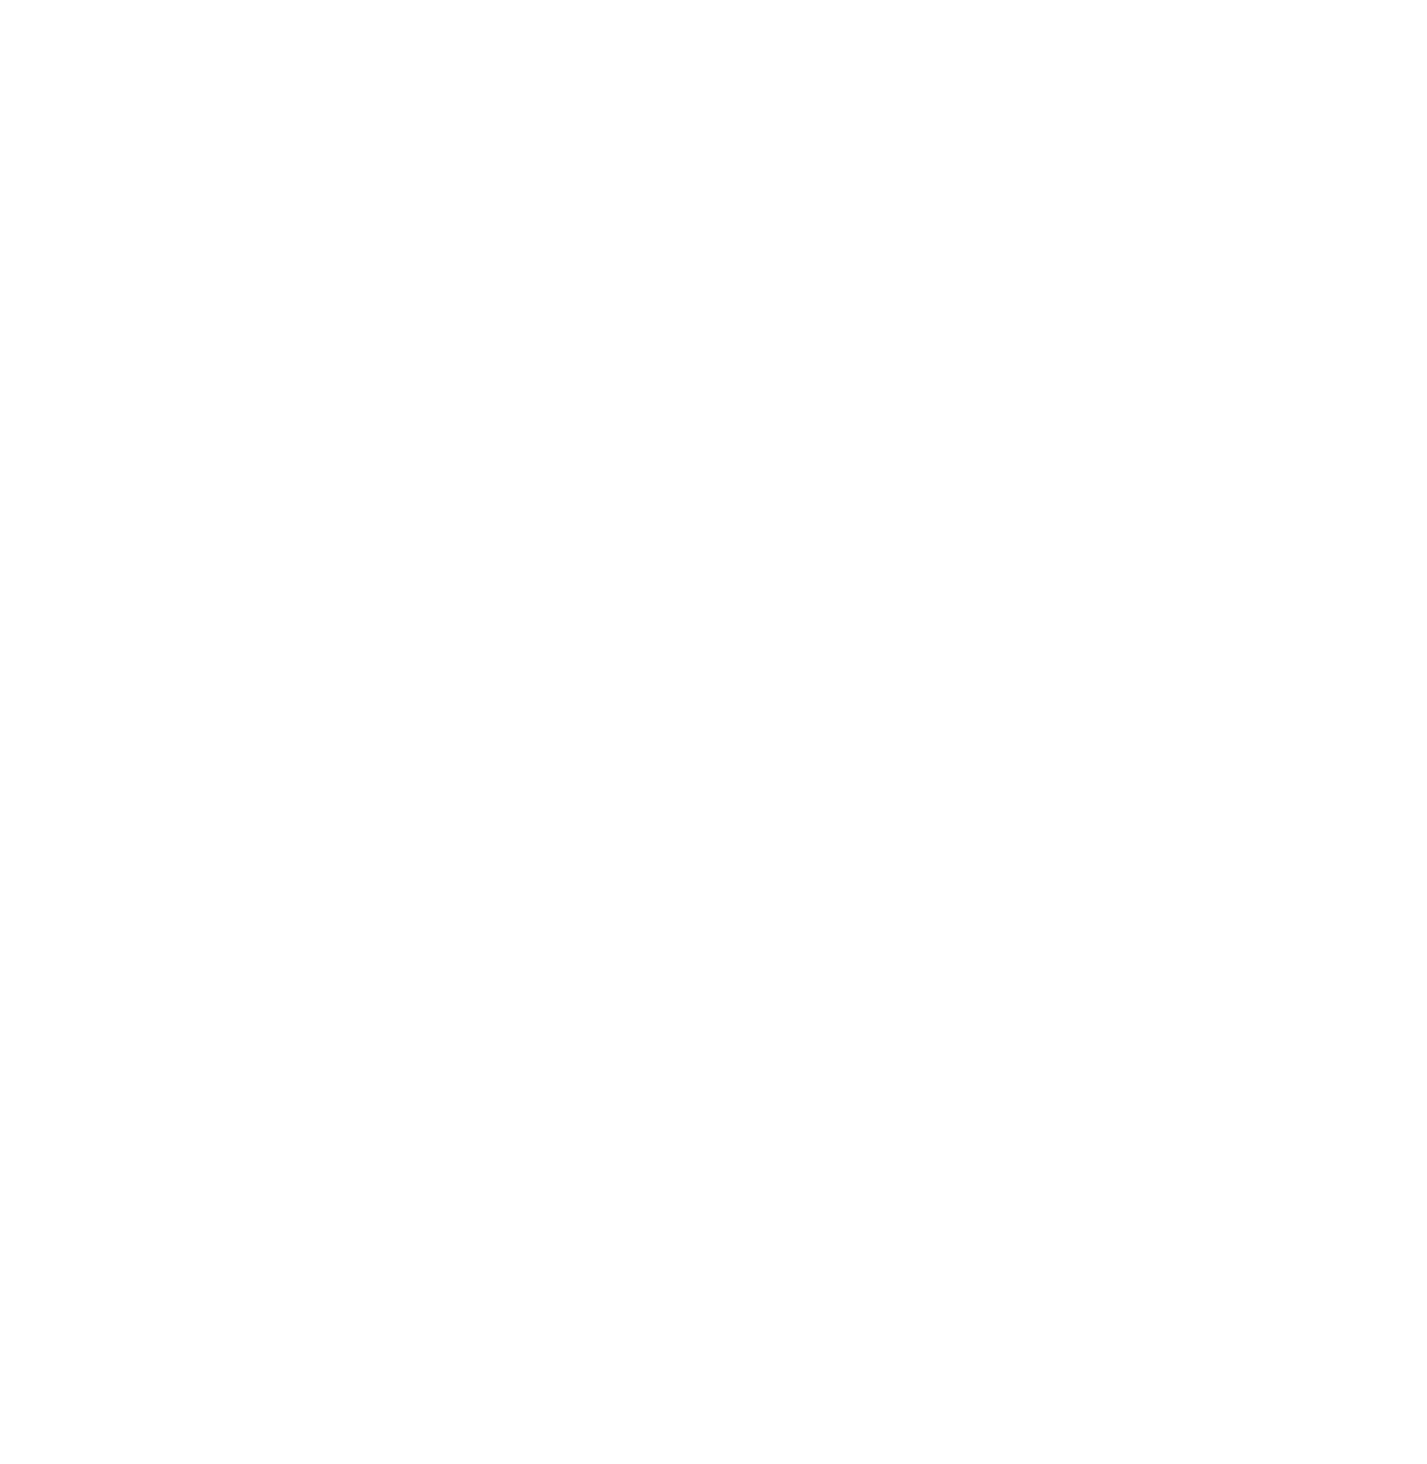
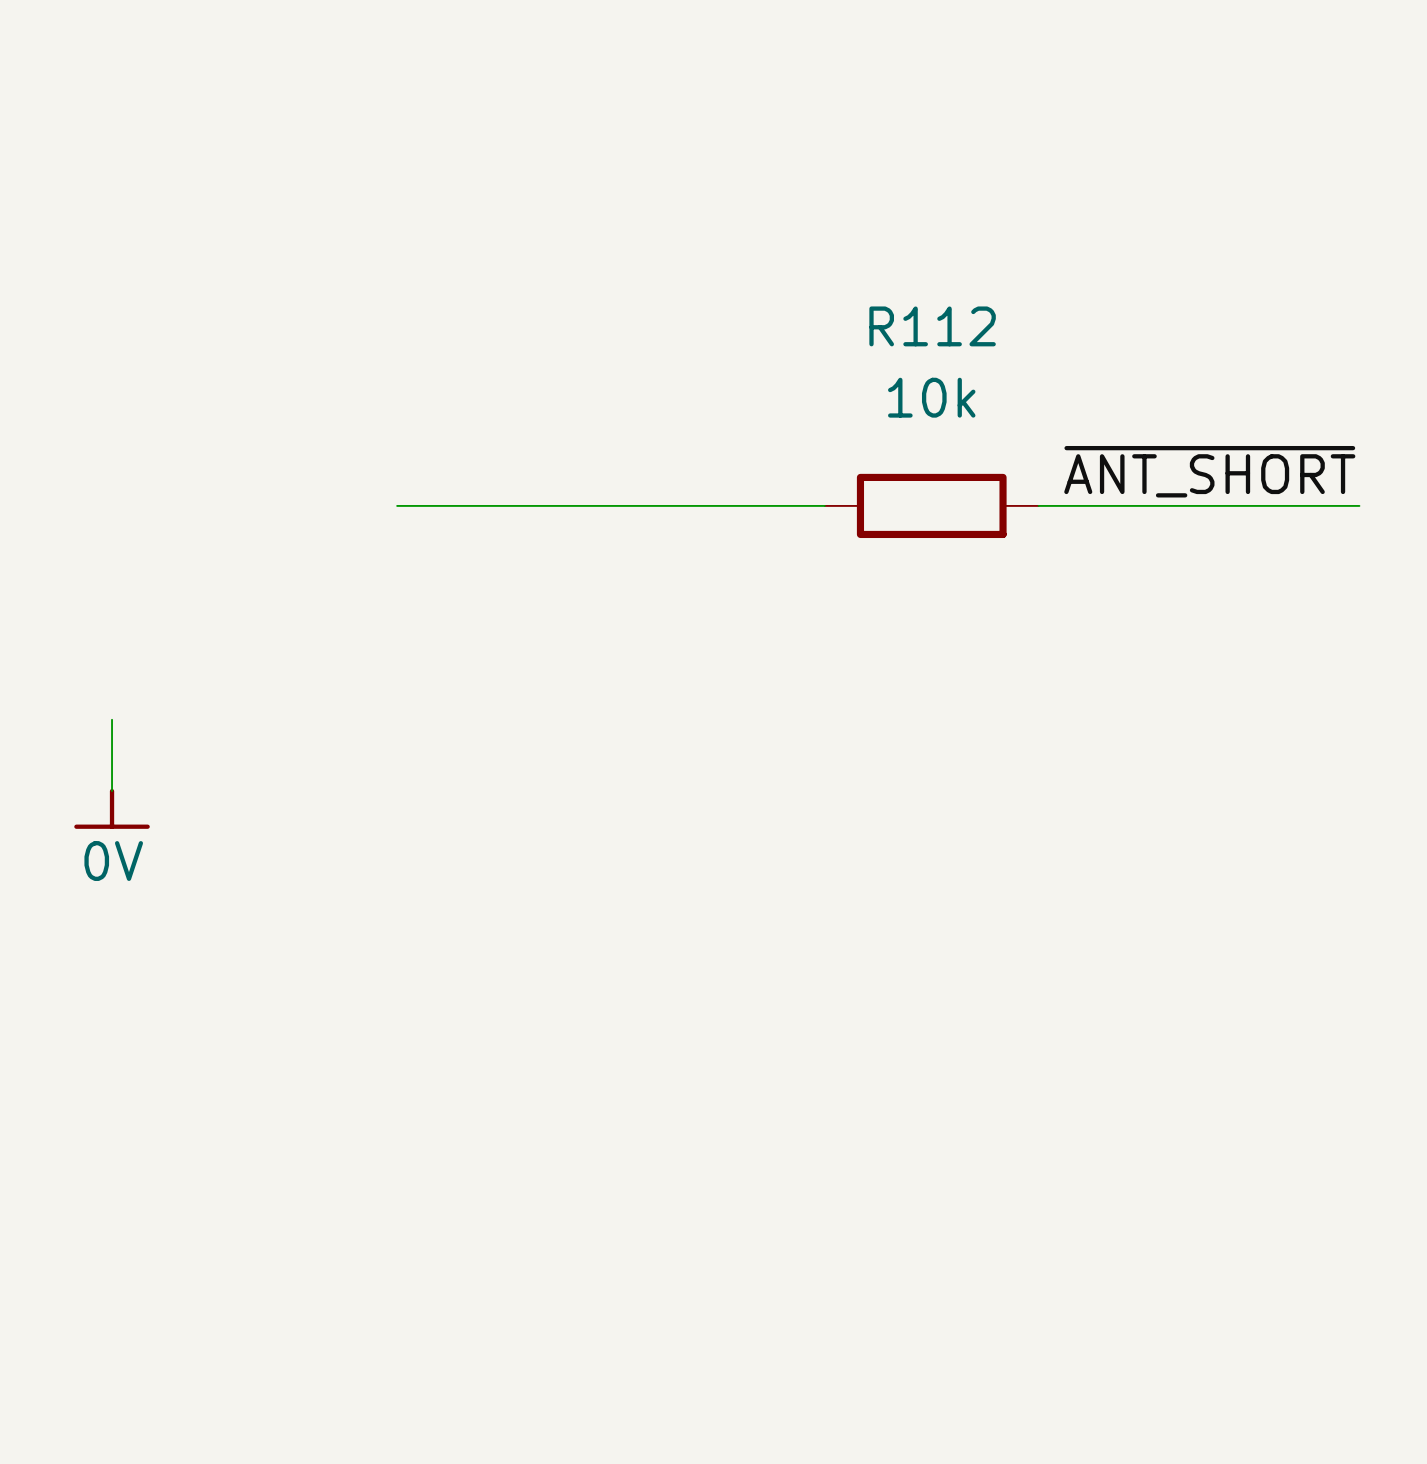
label: none -> ~{ANT_SHORT} (1209, 471)
wire: none -> (397, 505) (824, 505)
R112: none -> 10k (931, 505)
wire: none -> (1038, 505) (1359, 505)
wire: none -> (112, 719) (112, 791)
power symbol: none -> 0V (112, 808)

